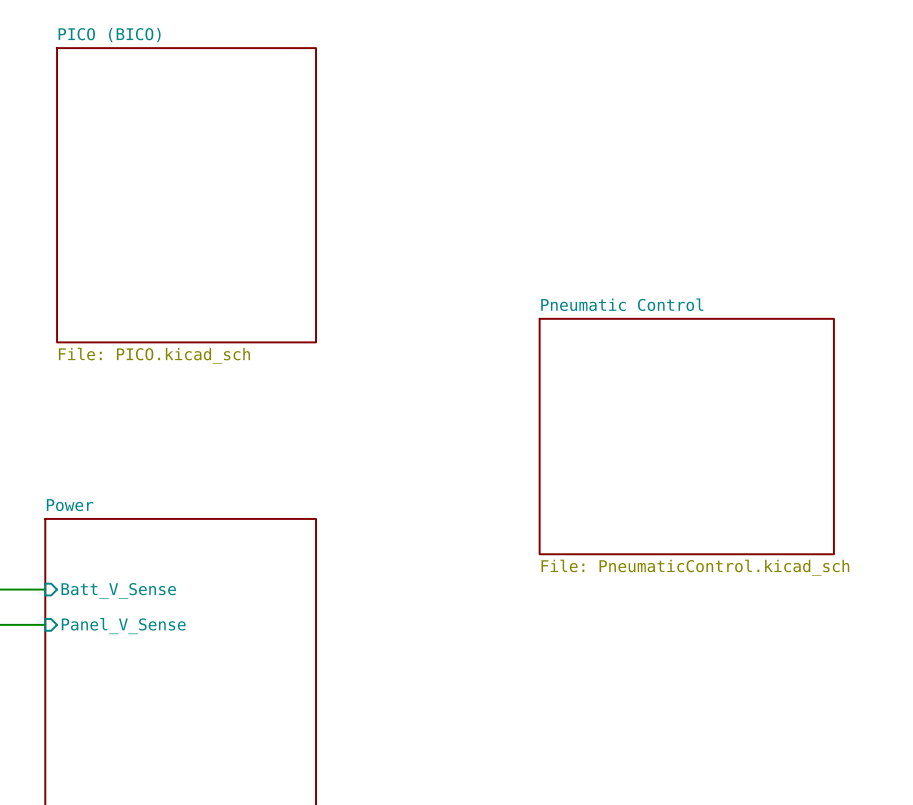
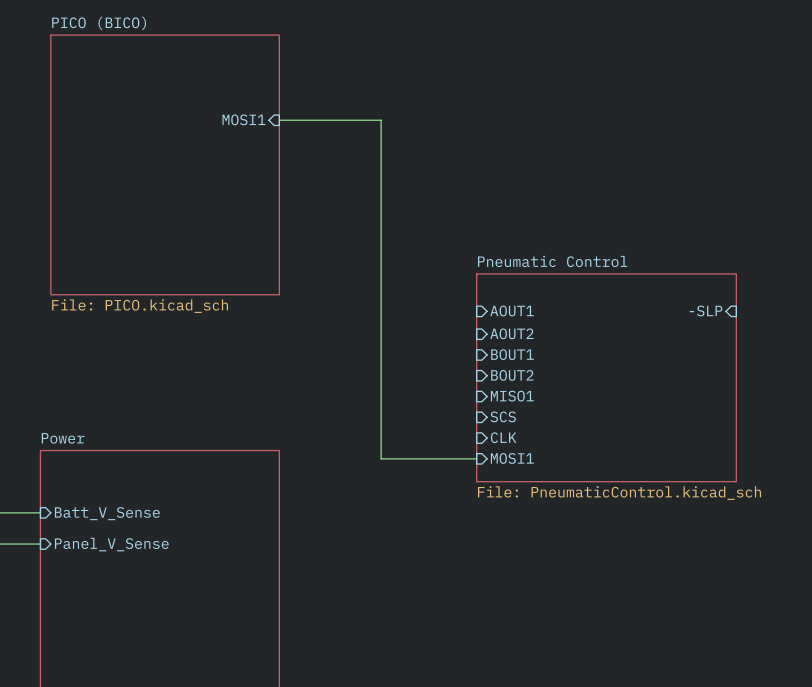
sheet pin: none -> MOSI1 (243, 119)
wire: none -> (279, 120) (381, 120) (381, 458) (476, 458)
sheet pin: none -> AOUT1 (512, 310)
sheet pin: none -> -SLP (706, 310)
sheet pin: none -> AOUT2 (511, 333)
sheet pin: none -> BOUT1 (512, 354)
sheet pin: none -> BOUT2 (512, 375)
sheet pin: none -> MISO1 (512, 396)
sheet pin: none -> SCS (503, 416)
sheet pin: none -> CLK (503, 437)
sheet pin: none -> MOSI1 (512, 458)

